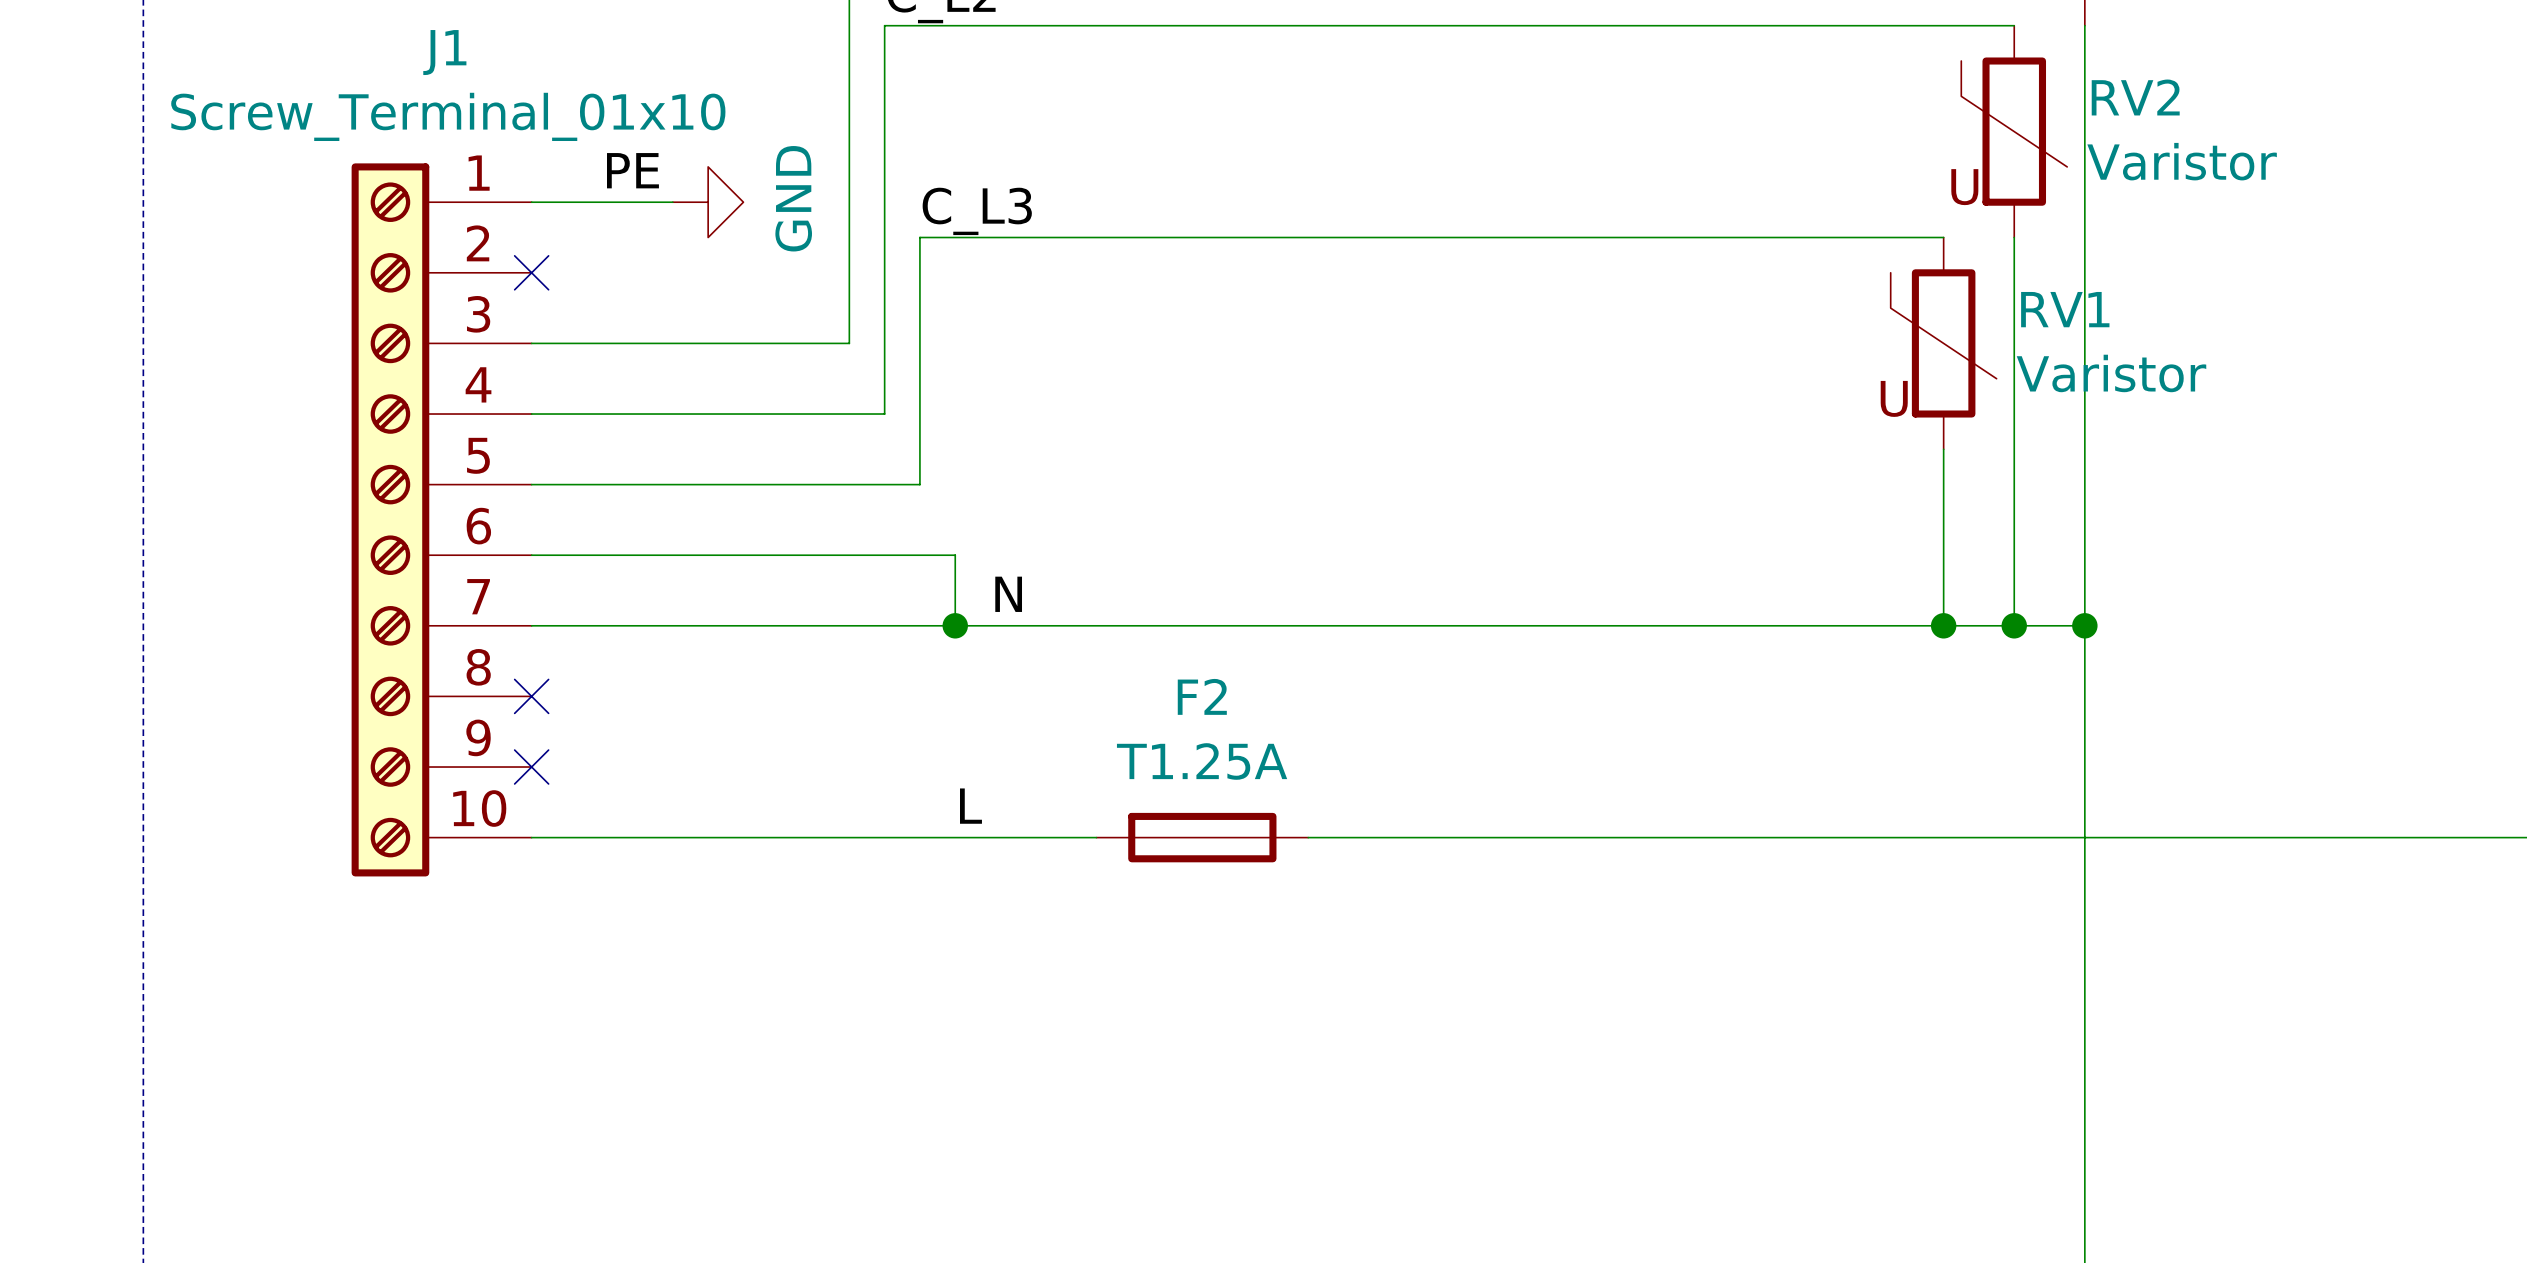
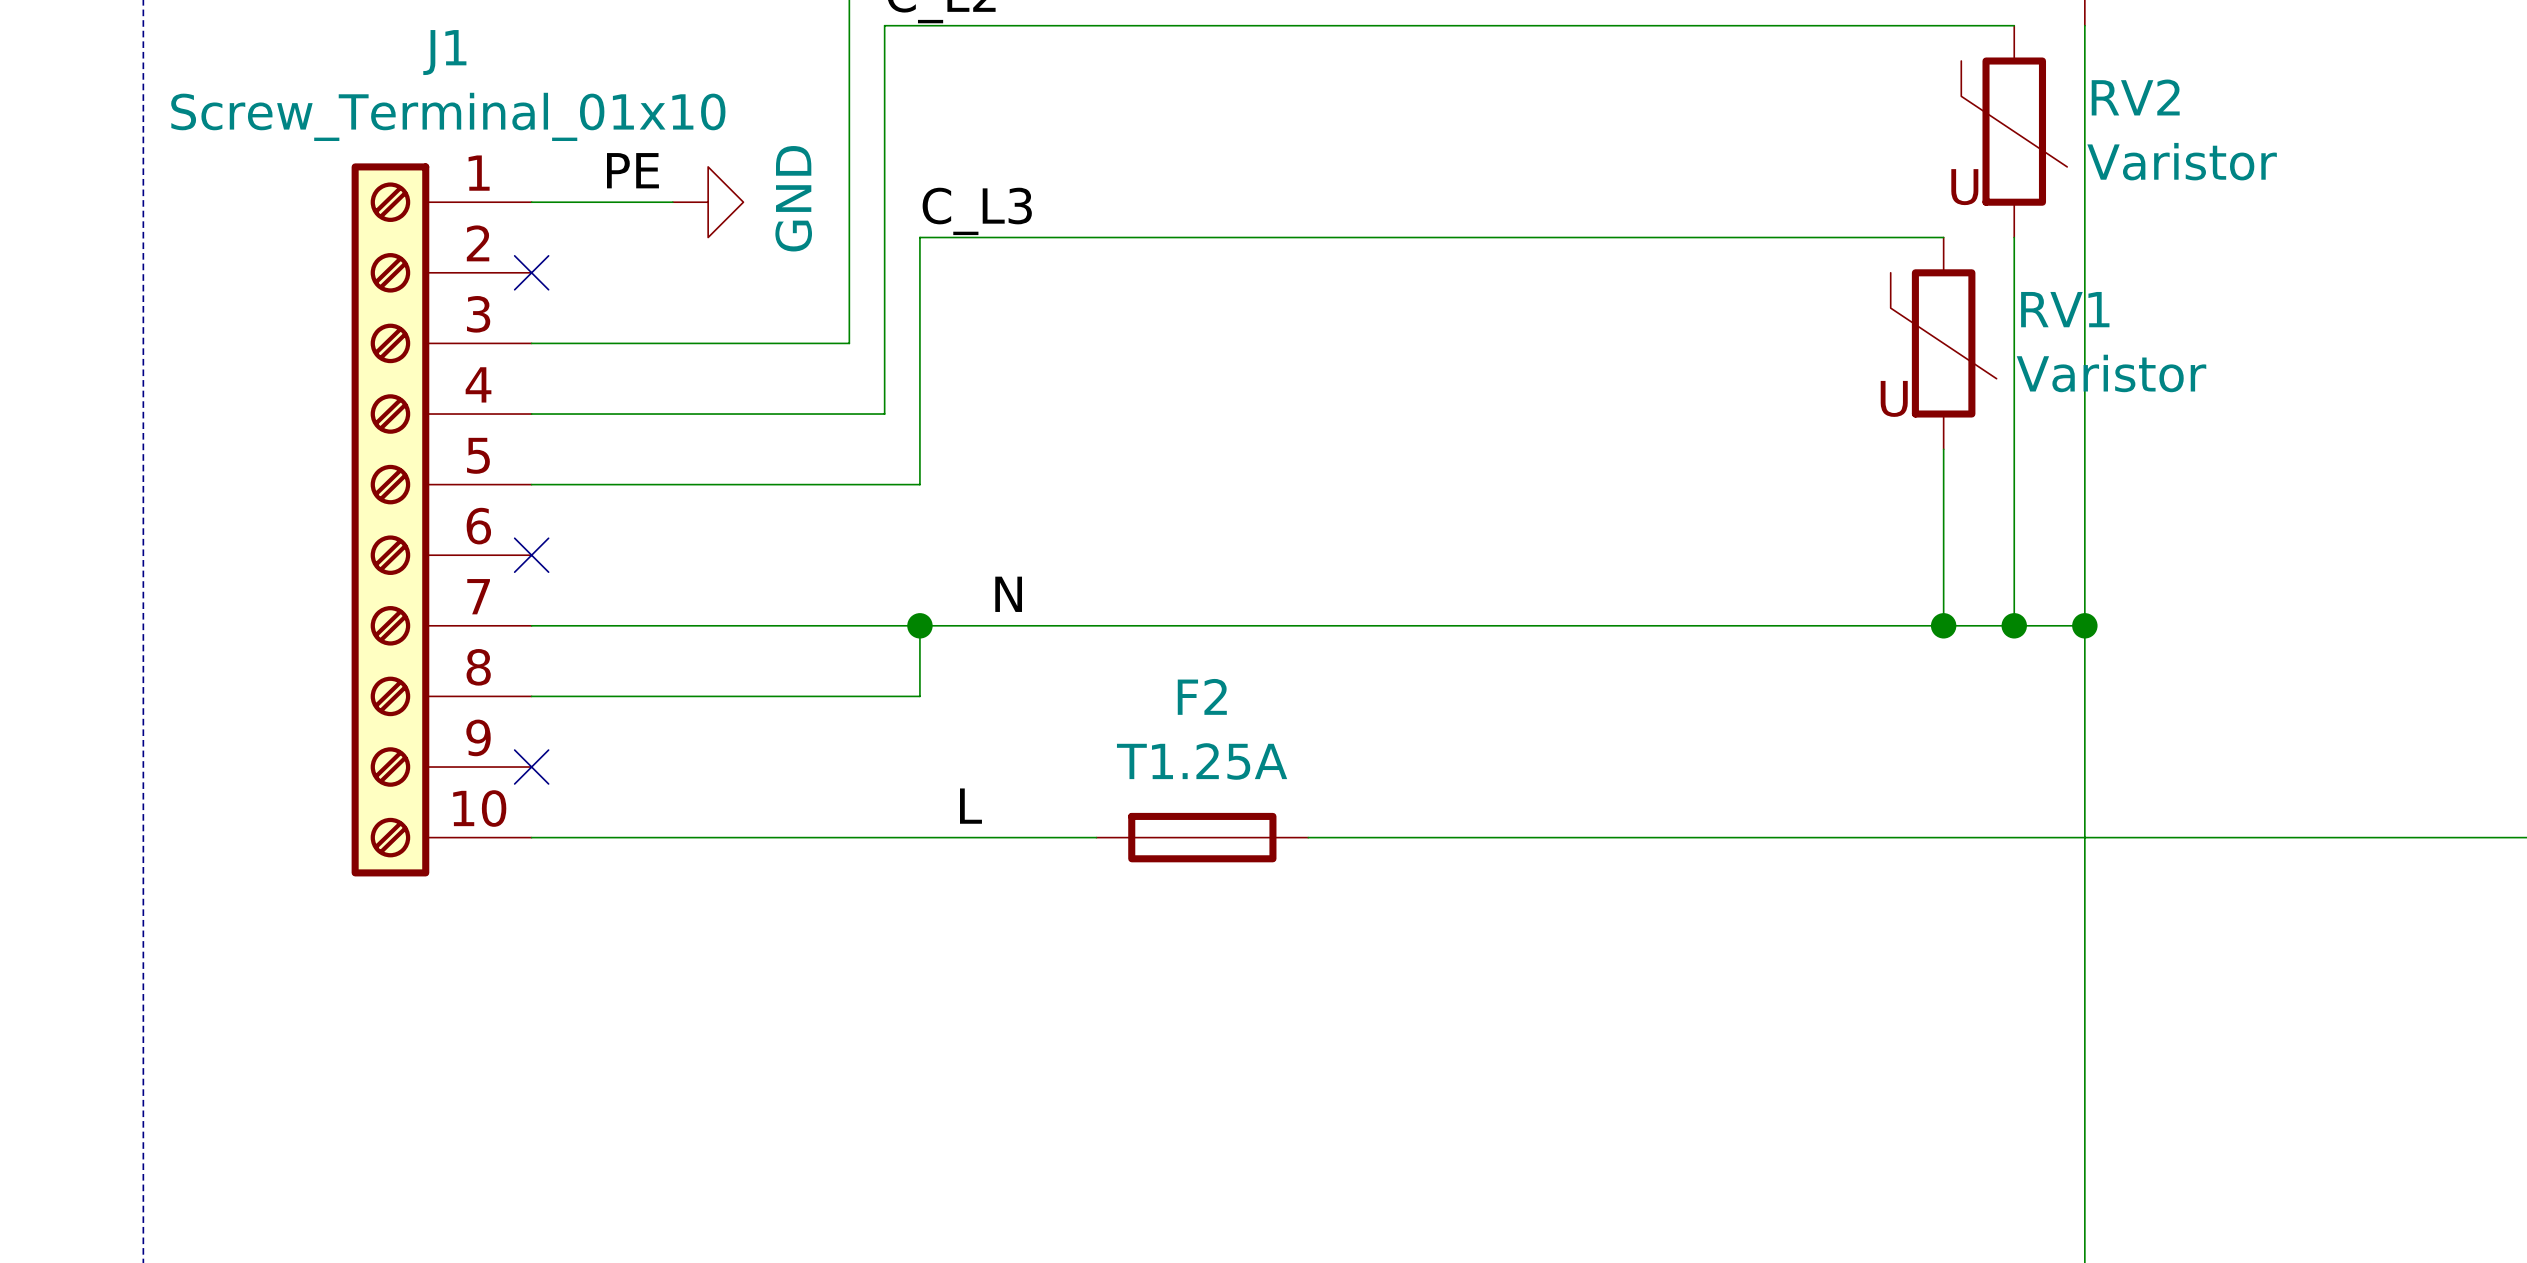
wire: (531, 555) (955, 555) (955, 625) -> none
wire: none -> (919, 625) (919, 696) (531, 696)
junction position: (955, 625) -> (919, 625)
no-connect mark position: (531, 696) -> (531, 555)

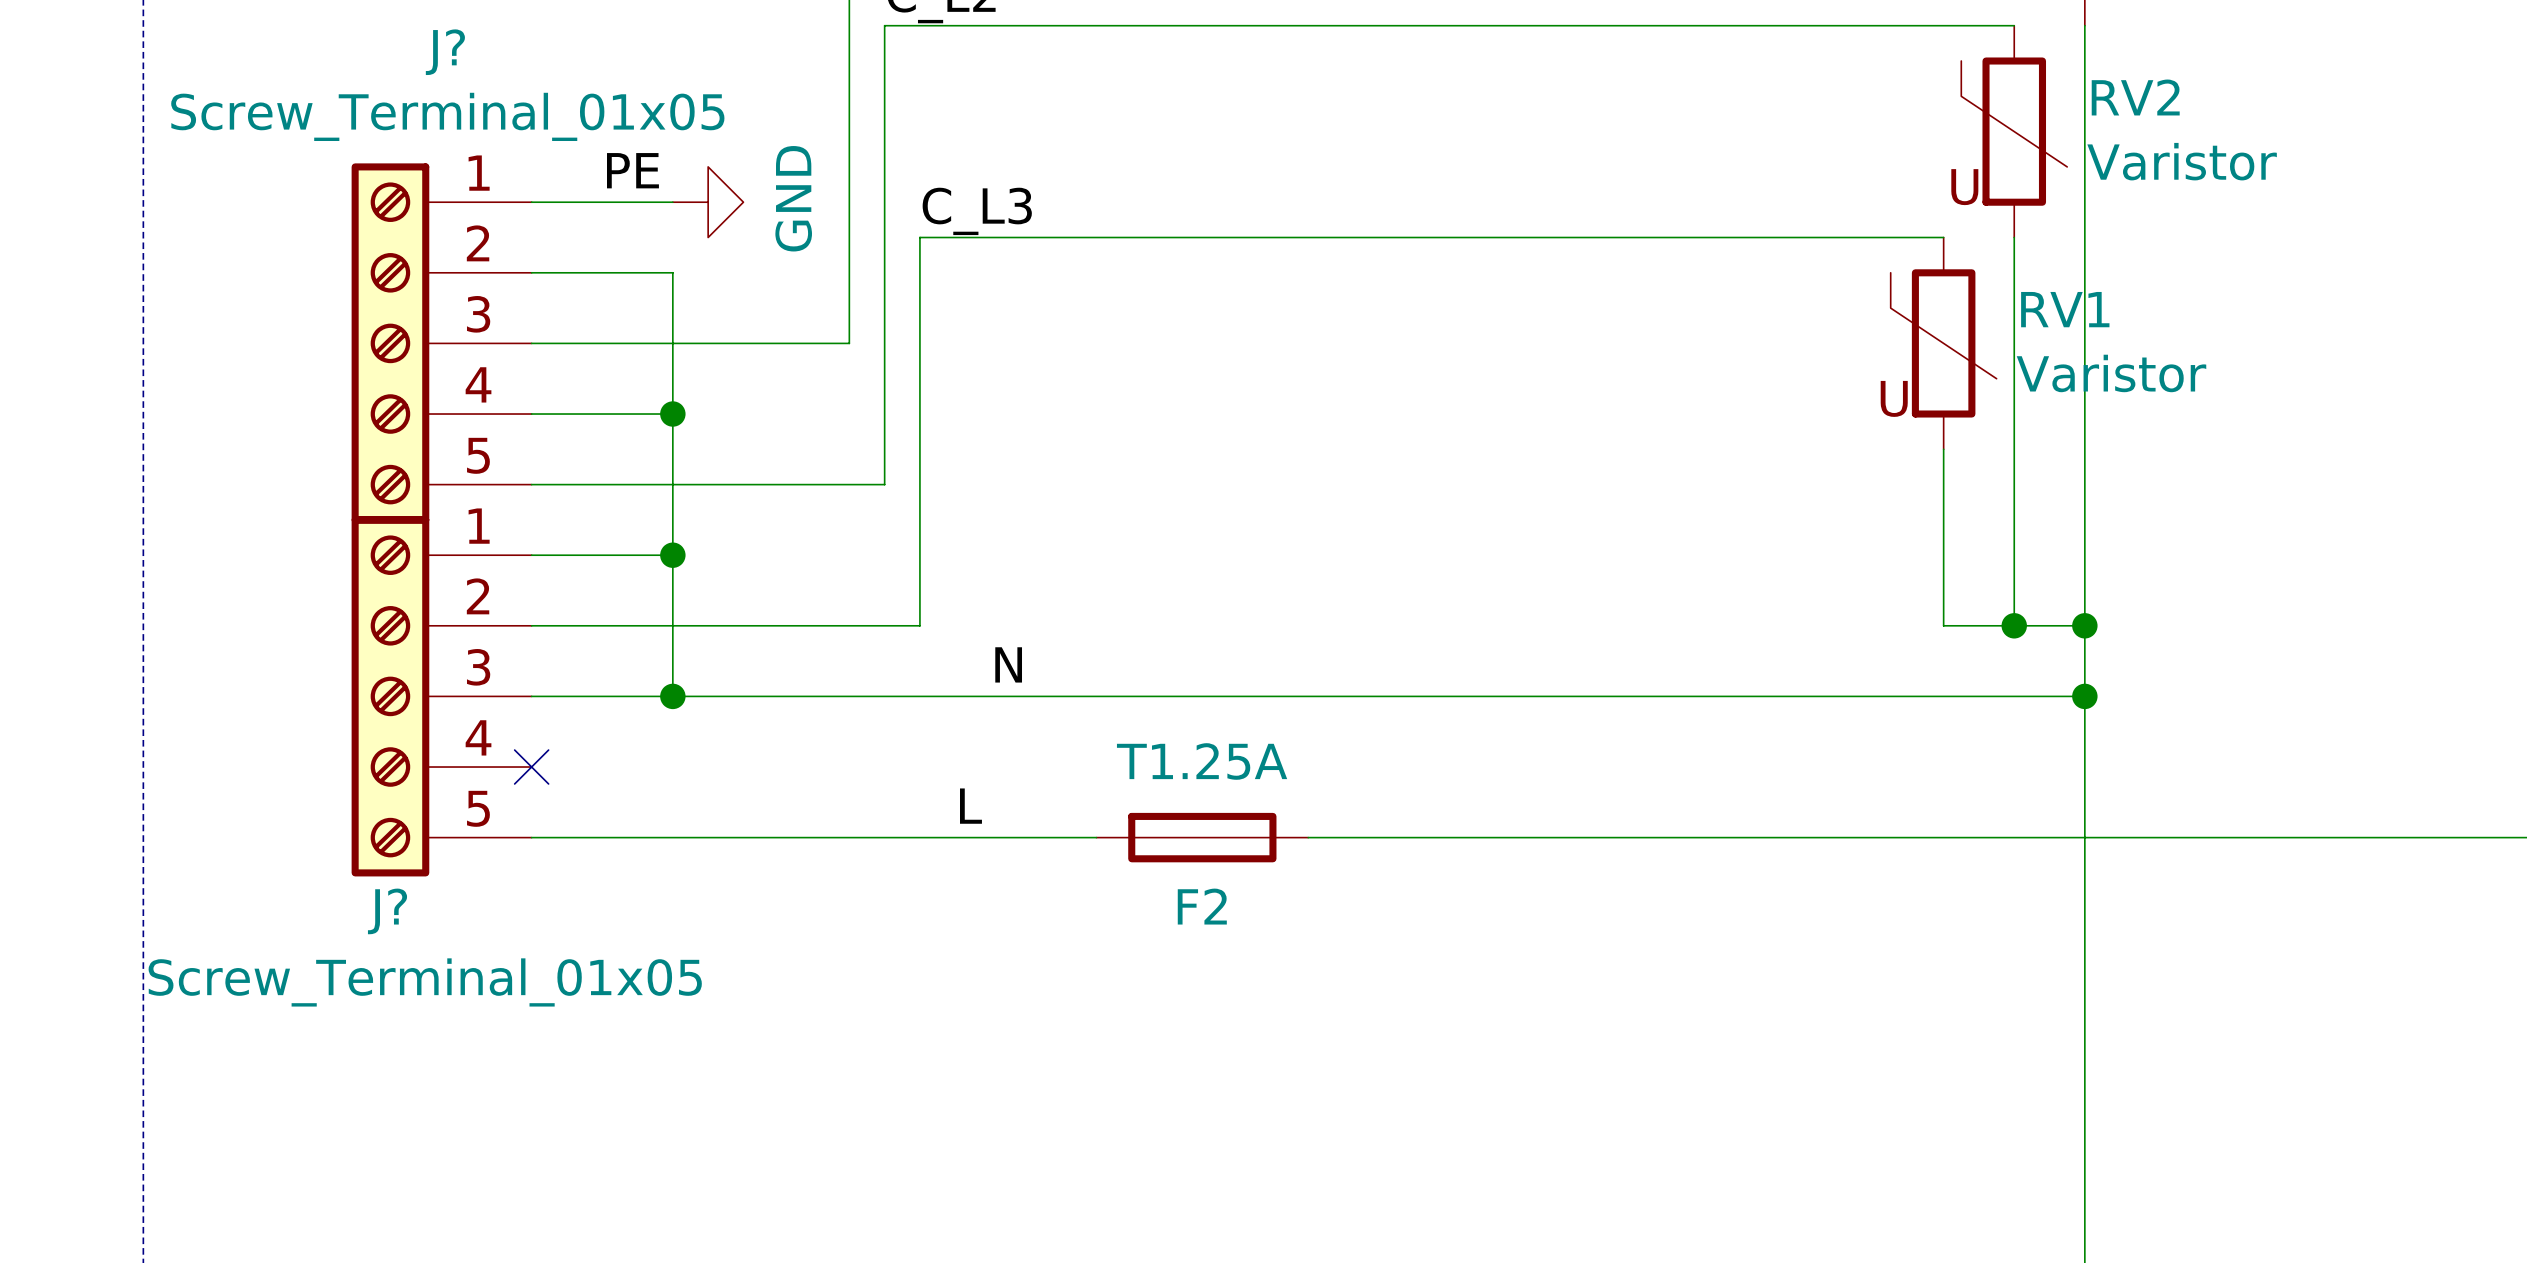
wire: none -> (531, 272) (672, 272) (672, 696)
no-connect mark: (531, 272) -> none
J?: none -> Screw_Terminal_01x05 (441, 343)
wire: (672, 414) (884, 414) -> none
junction: none -> (672, 414)
wire: (884, 484) (919, 484) -> (884, 484) (884, 414)
wire: none -> (919, 484) (919, 625)
J1: Screw_Terminal_01x10 (441, 519) -> none
wire: none -> (531, 555) (672, 555)
no-connect mark: (531, 555) -> none
junction: none -> (672, 555)
label position: N (1008, 594) -> N (1008, 664)
junction: (919, 625) -> none
wire: (1943, 625) (919, 625) (919, 696) -> (2084, 696) (919, 696)
junction position: (1943, 625) -> (2084, 696)
J?: none -> Screw_Terminal_01x05 (441, 696)
junction: none -> (672, 696)
F2 name position: F2 (1202, 696) -> F2 (1202, 906)

